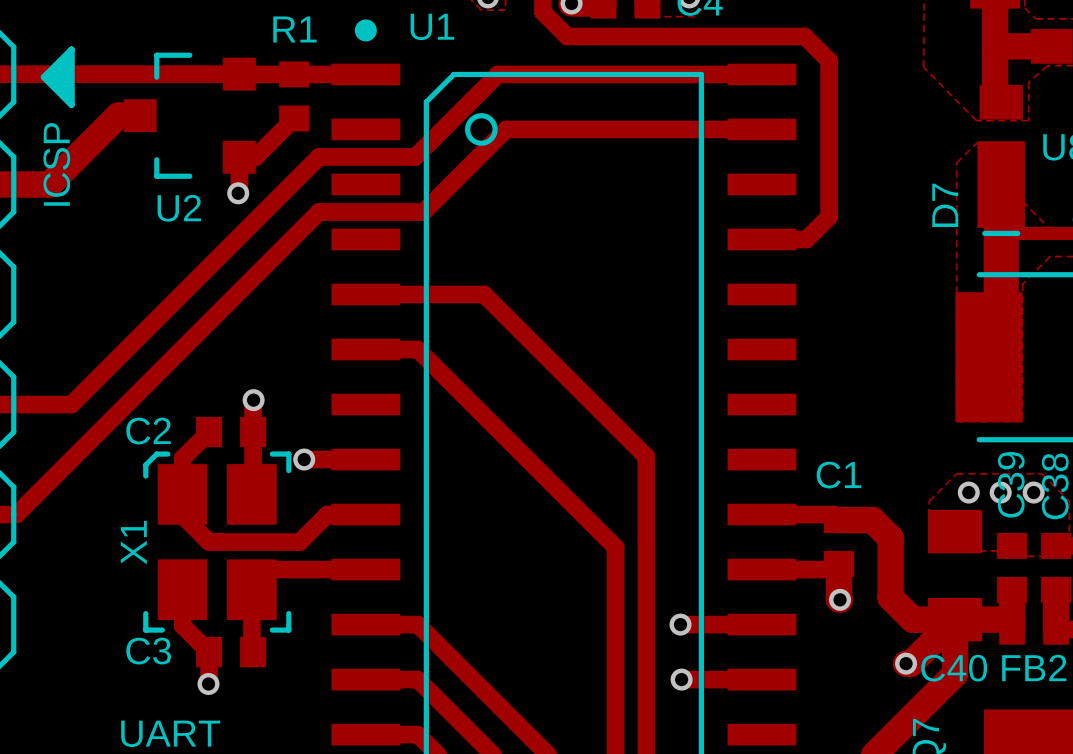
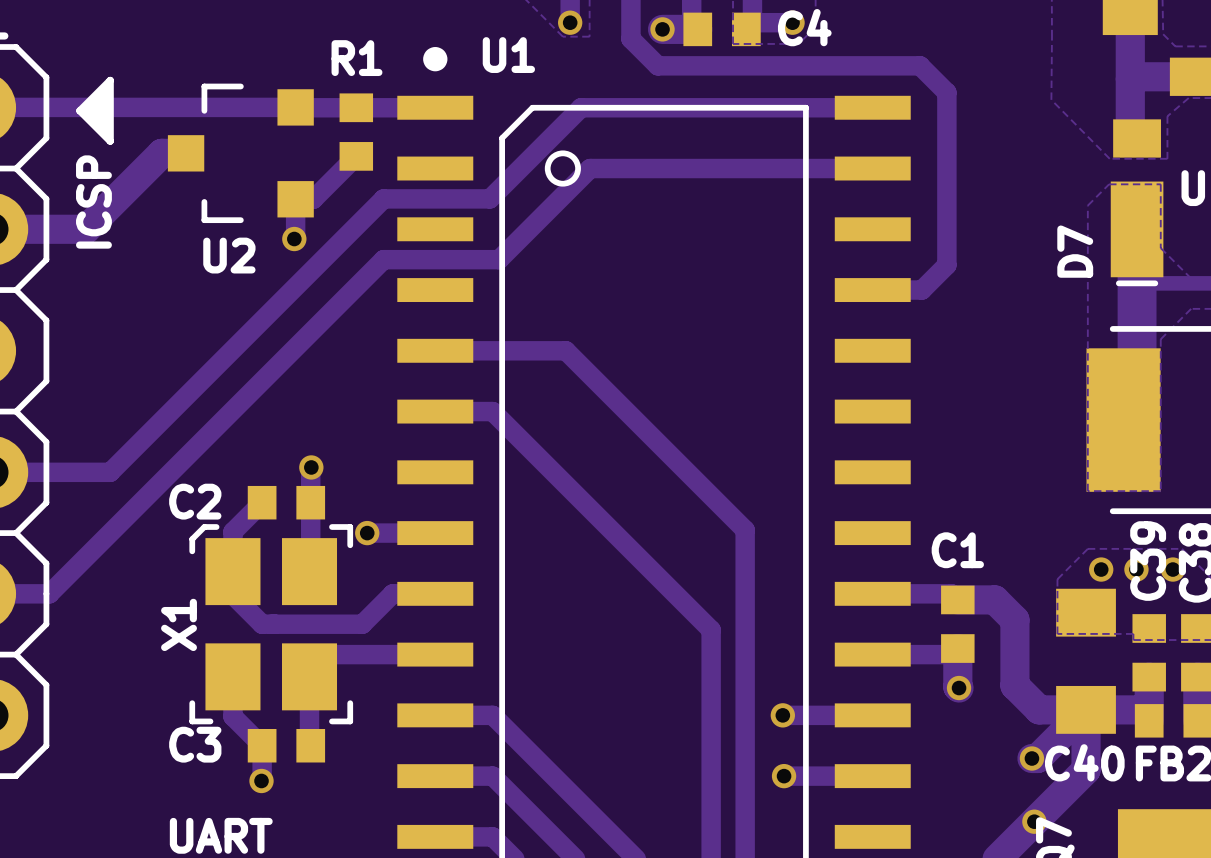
via: none -> (1034, 821)

